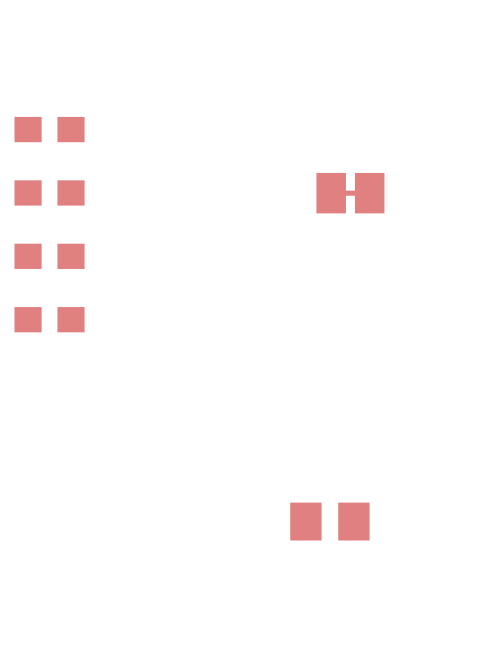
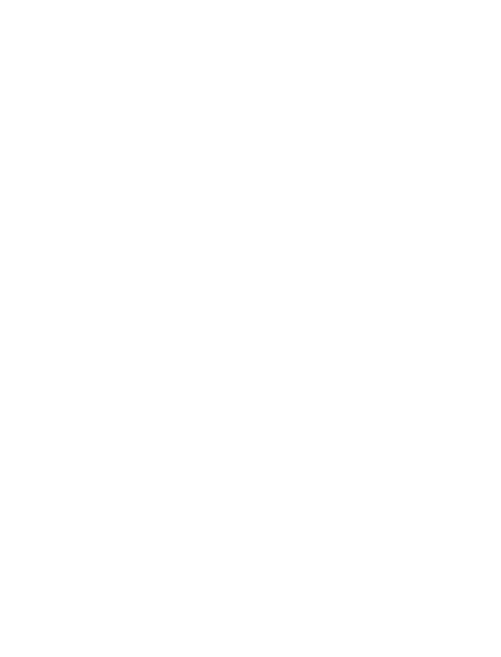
part: (49, 129) -> none
part: (49, 192) -> none
part: (350, 193) -> none
part: (49, 256) -> none
part: (49, 319) -> none
part: (329, 521) -> none

